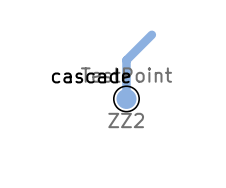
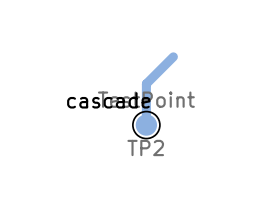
ZZ2 name: ZZ2 (126, 120) -> TP2 (145, 147)

